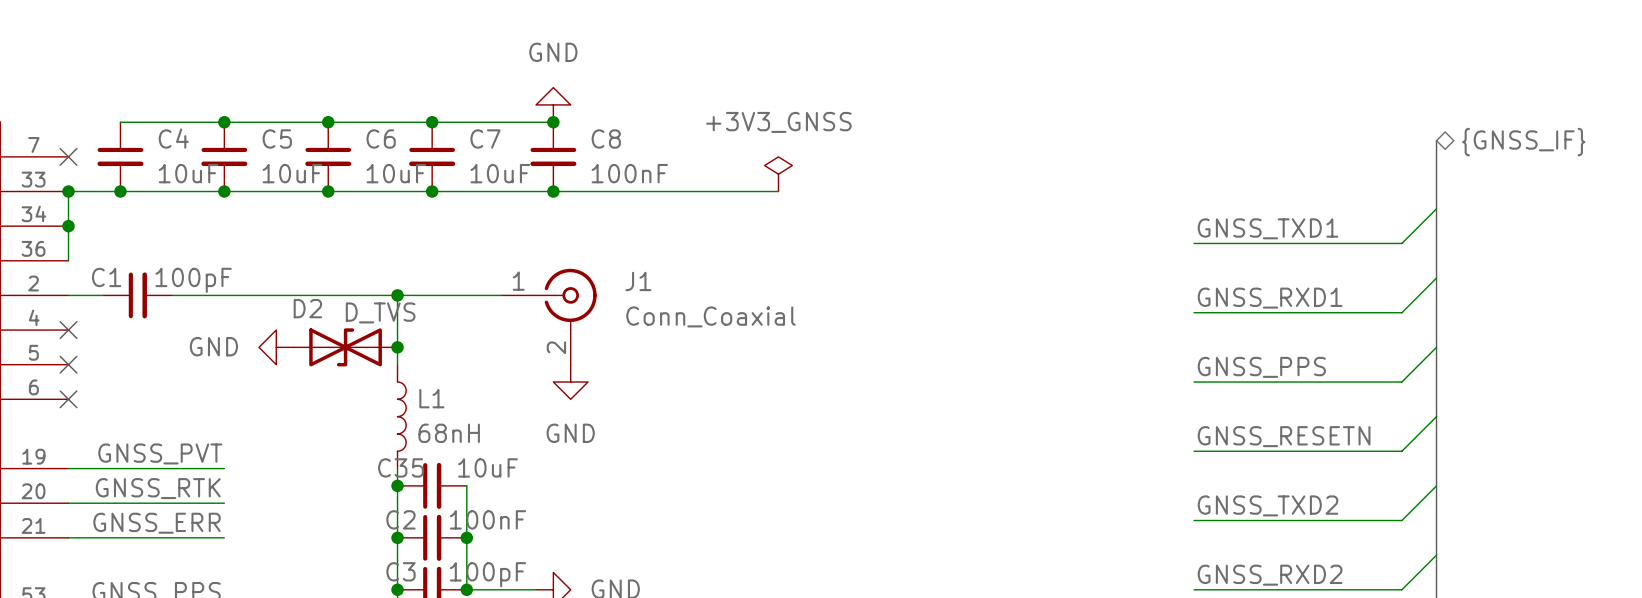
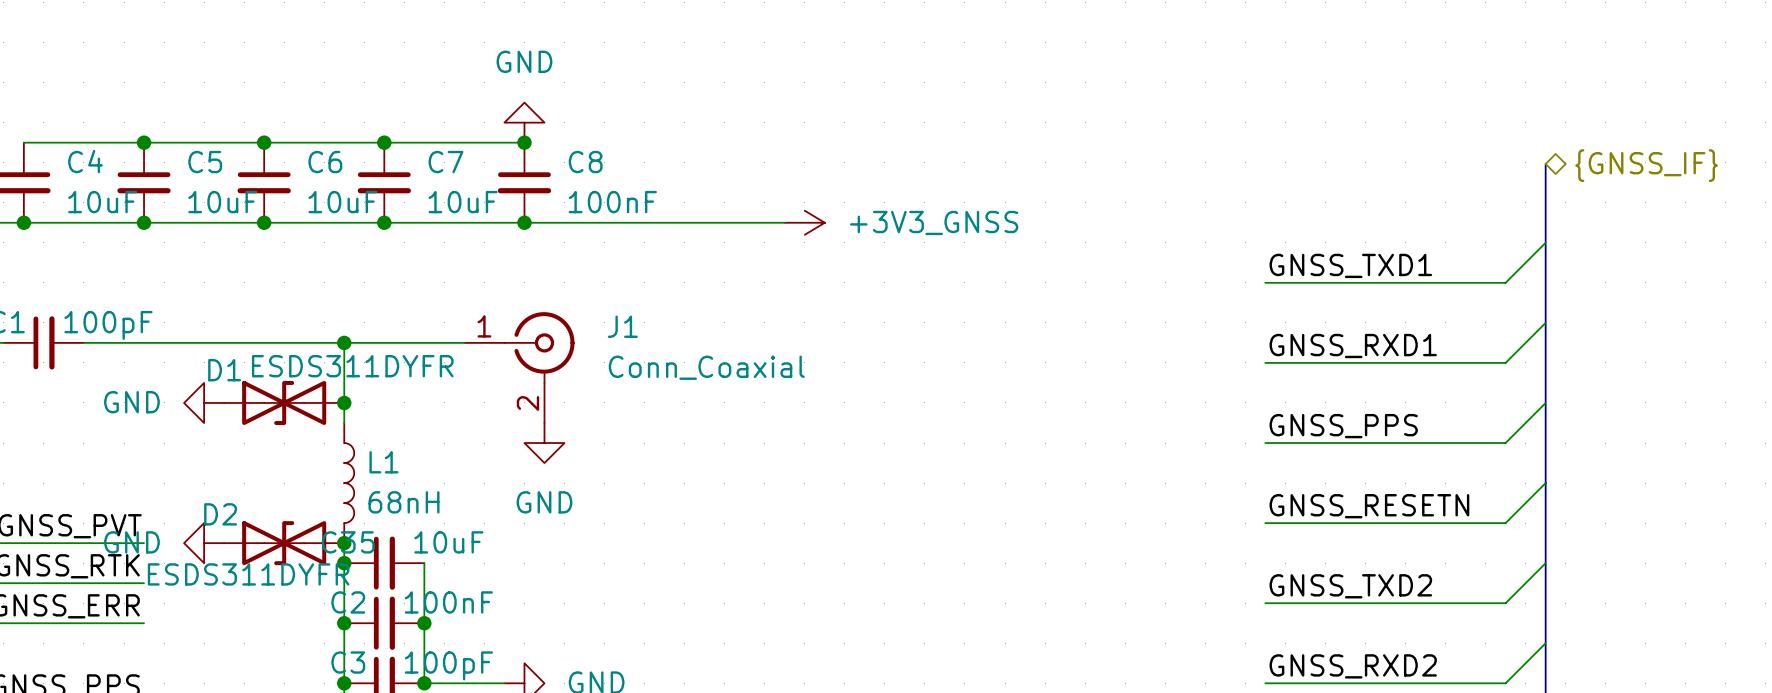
power symbol: +3V3_GNSS (778, 174) -> none
power symbol: none -> +3V3_GNSS (804, 222)
D2 name: D2 (307, 308) -> D1 (224, 370)
D2 value: D_TVS (380, 312) -> ESDS311DYFR (352, 366)
power symbol: none -> GND (204, 543)
D2: none -> ESDS311DYFR (284, 543)
junction: none -> (344, 543)

